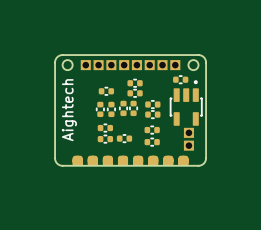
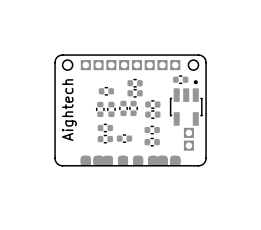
part: (77, 160) -> none
part: none -> (85, 160)
part: (92, 160) -> none
part: none -> (98, 160)
part: none -> (162, 160)
part: (168, 160) -> none
part: none -> (175, 160)
part: (183, 160) -> none

